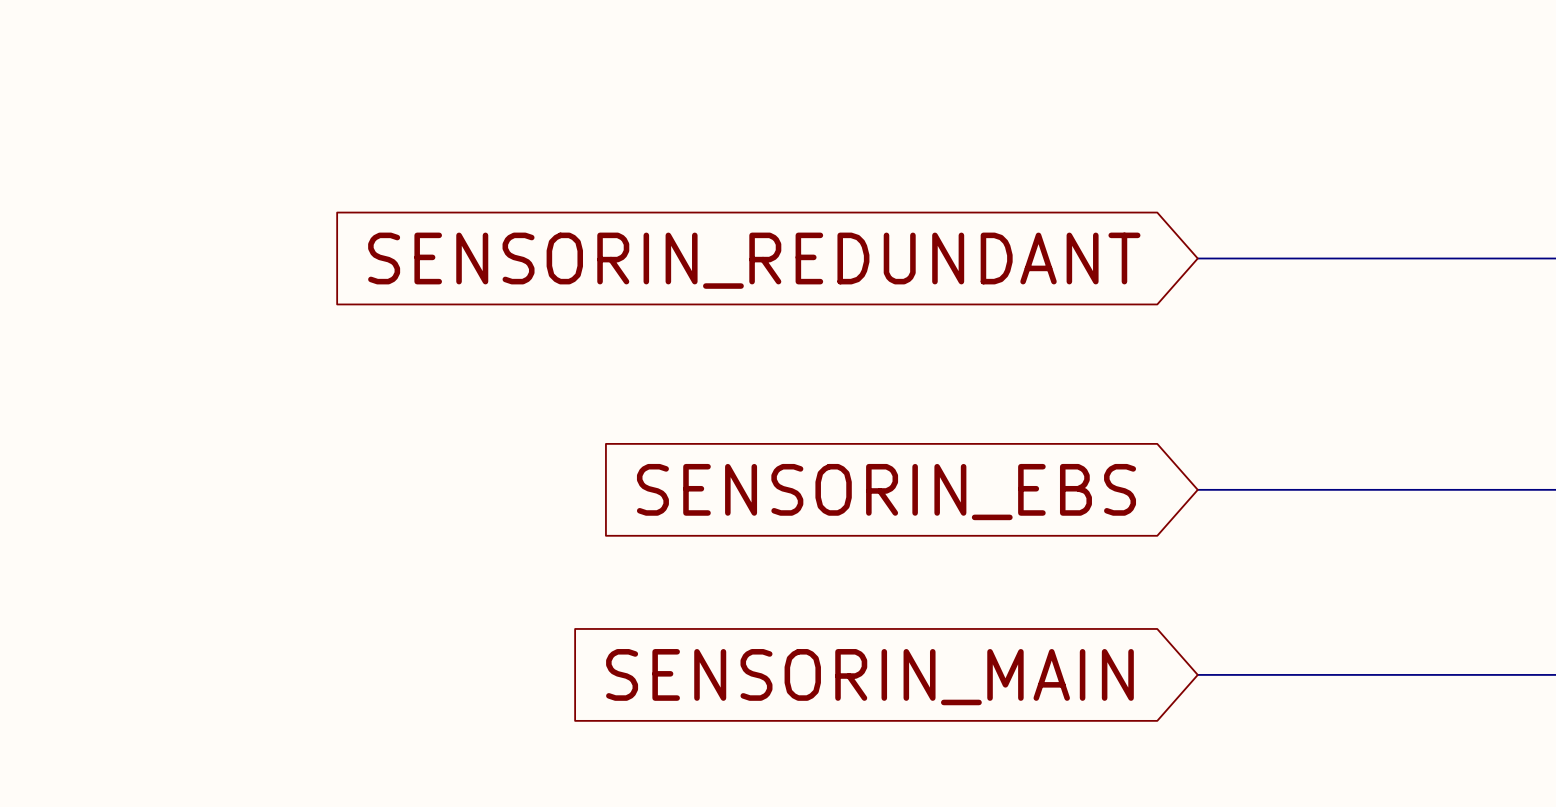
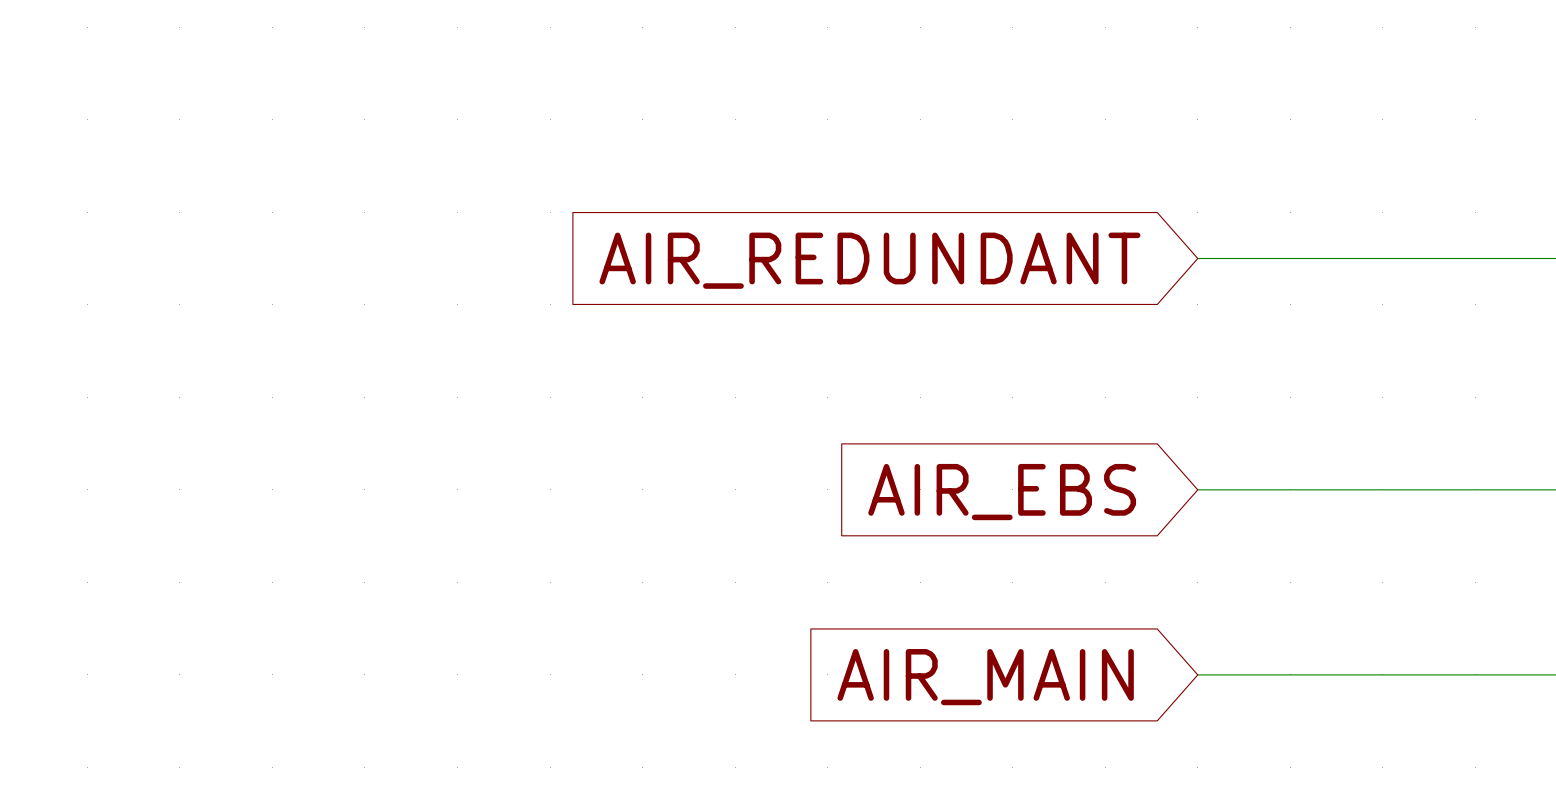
global label: SENSORIN_REDUNDANT (754, 260) -> AIR_REDUNDANT (869, 260)
global label: SENSORIN_EBS (886, 492) -> AIR_EBS (1002, 492)
global label: SENSORIN_MAIN (869, 677) -> AIR_MAIN (985, 677)

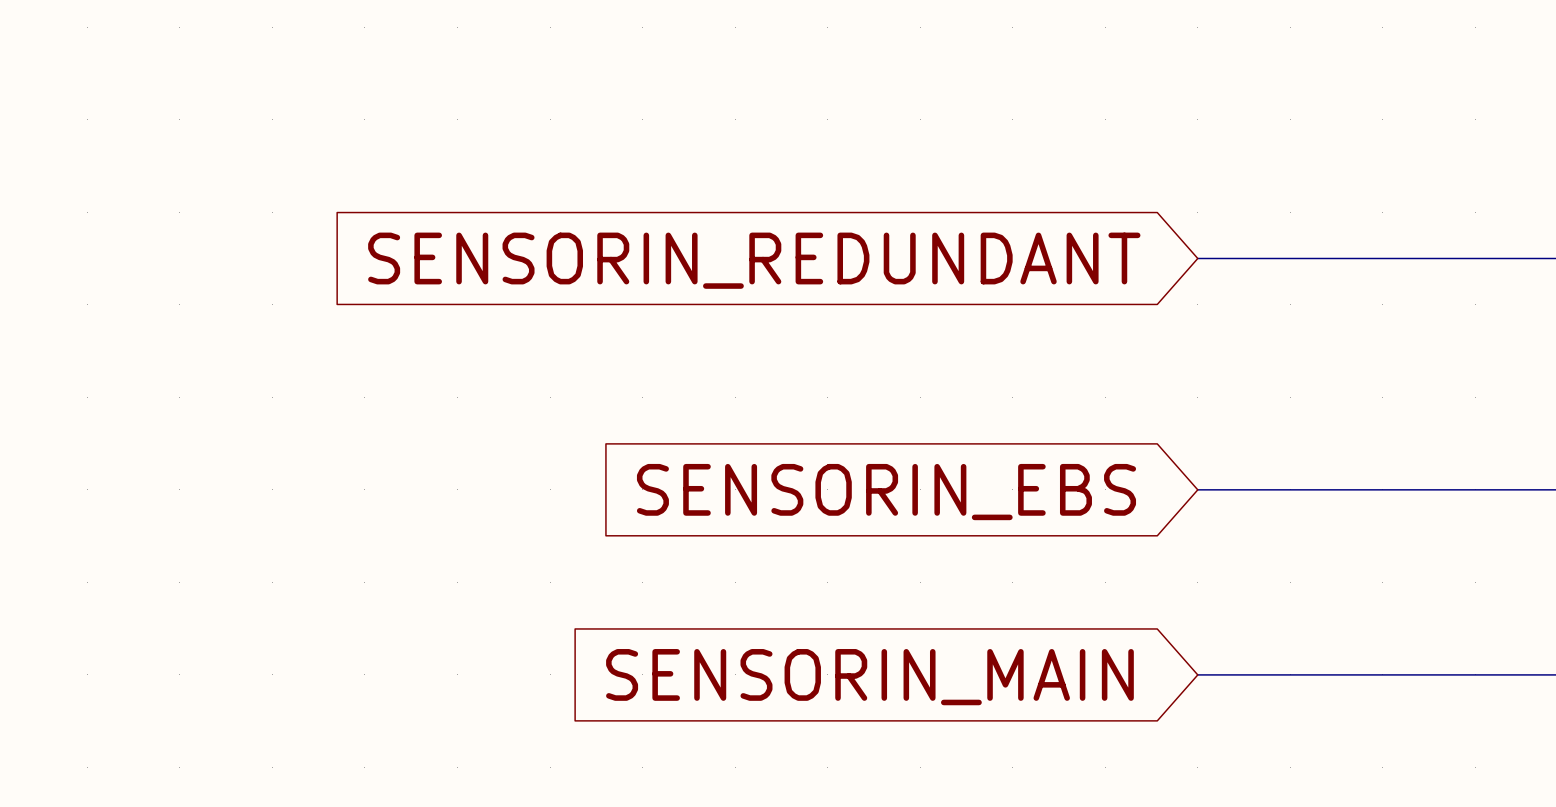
global label: AIR_REDUNDANT (869, 260) -> SENSORIN_REDUNDANT (754, 260)
global label: AIR_EBS (1002, 492) -> SENSORIN_EBS (886, 492)
global label: AIR_MAIN (985, 677) -> SENSORIN_MAIN (869, 677)

